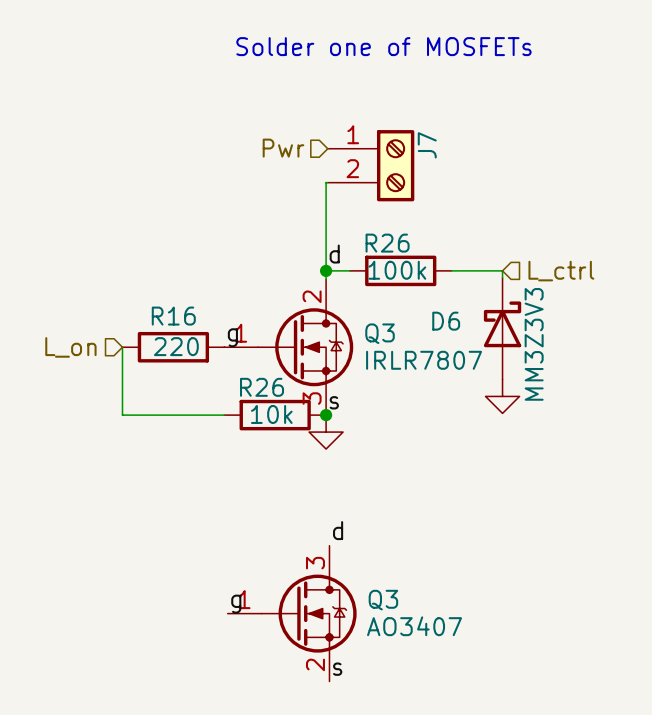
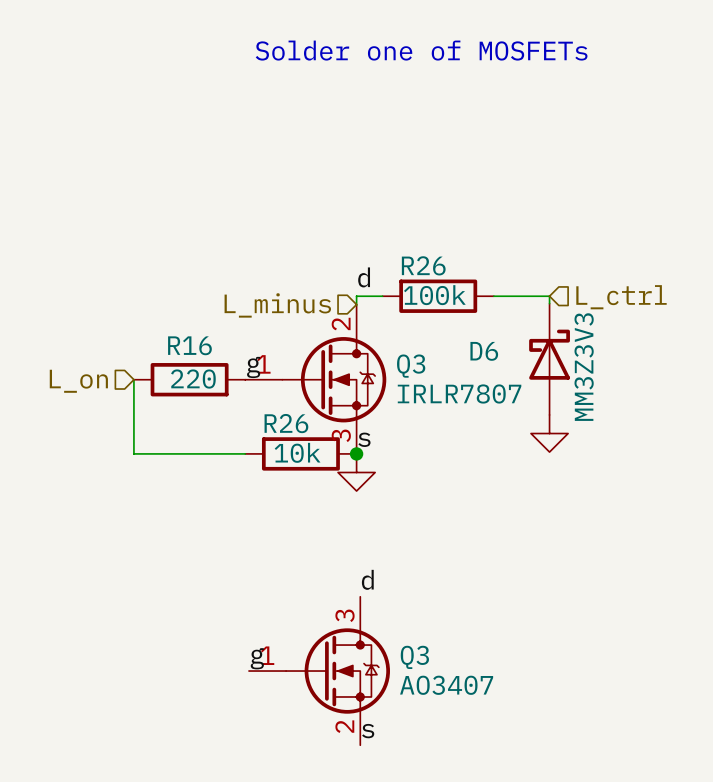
hierarchical label: Pwr (283, 148) -> none
J7: (371, 165) -> none
wire: (327, 182) (326, 182) (326, 270) -> none
junction: (326, 270) -> none
hierarchical label: none -> L_minus (277, 305)

